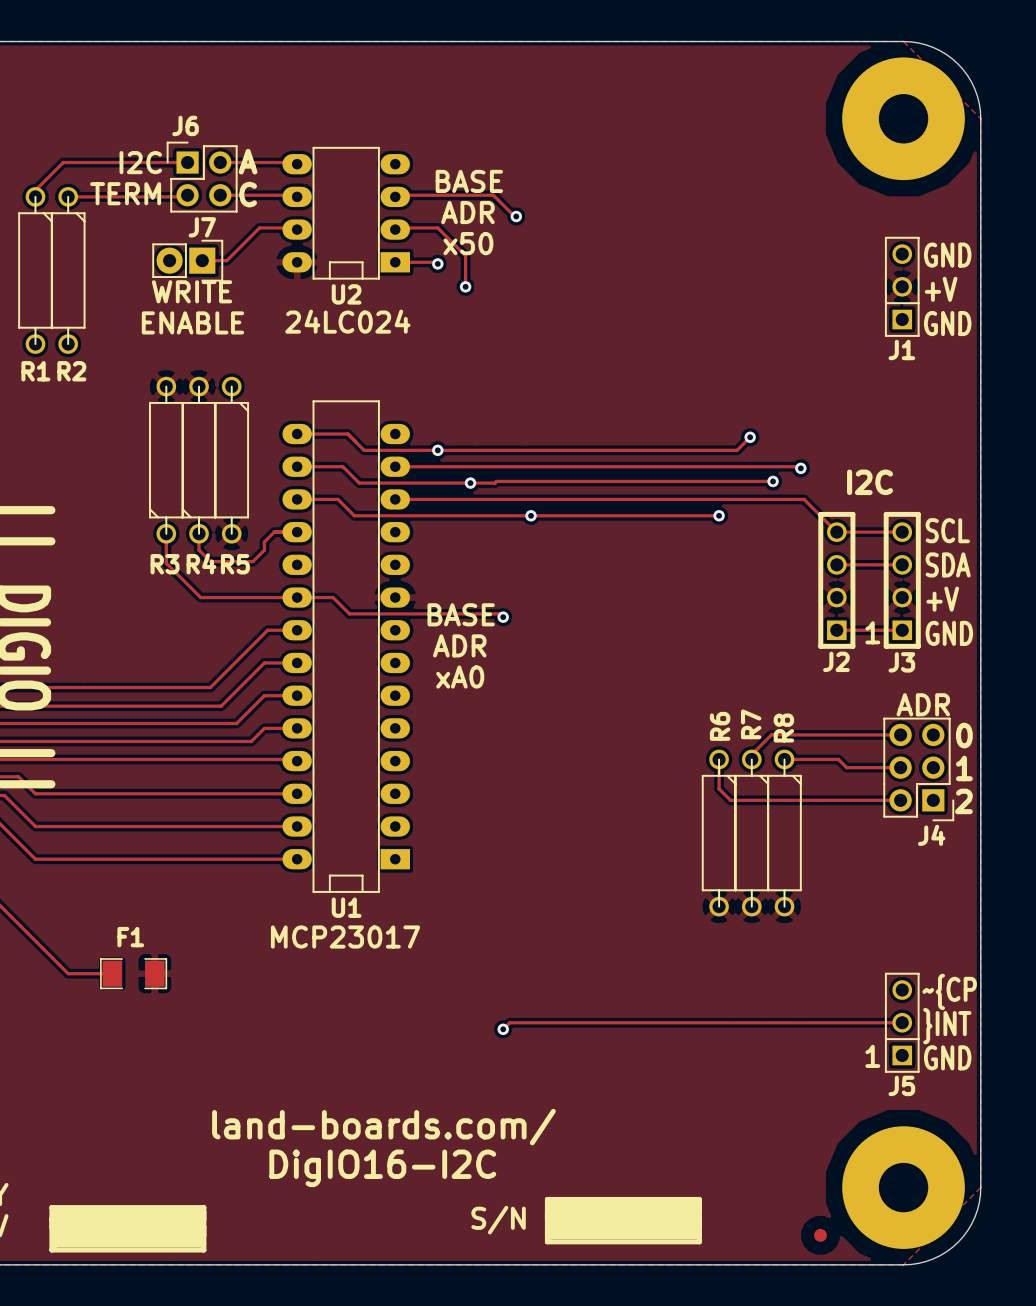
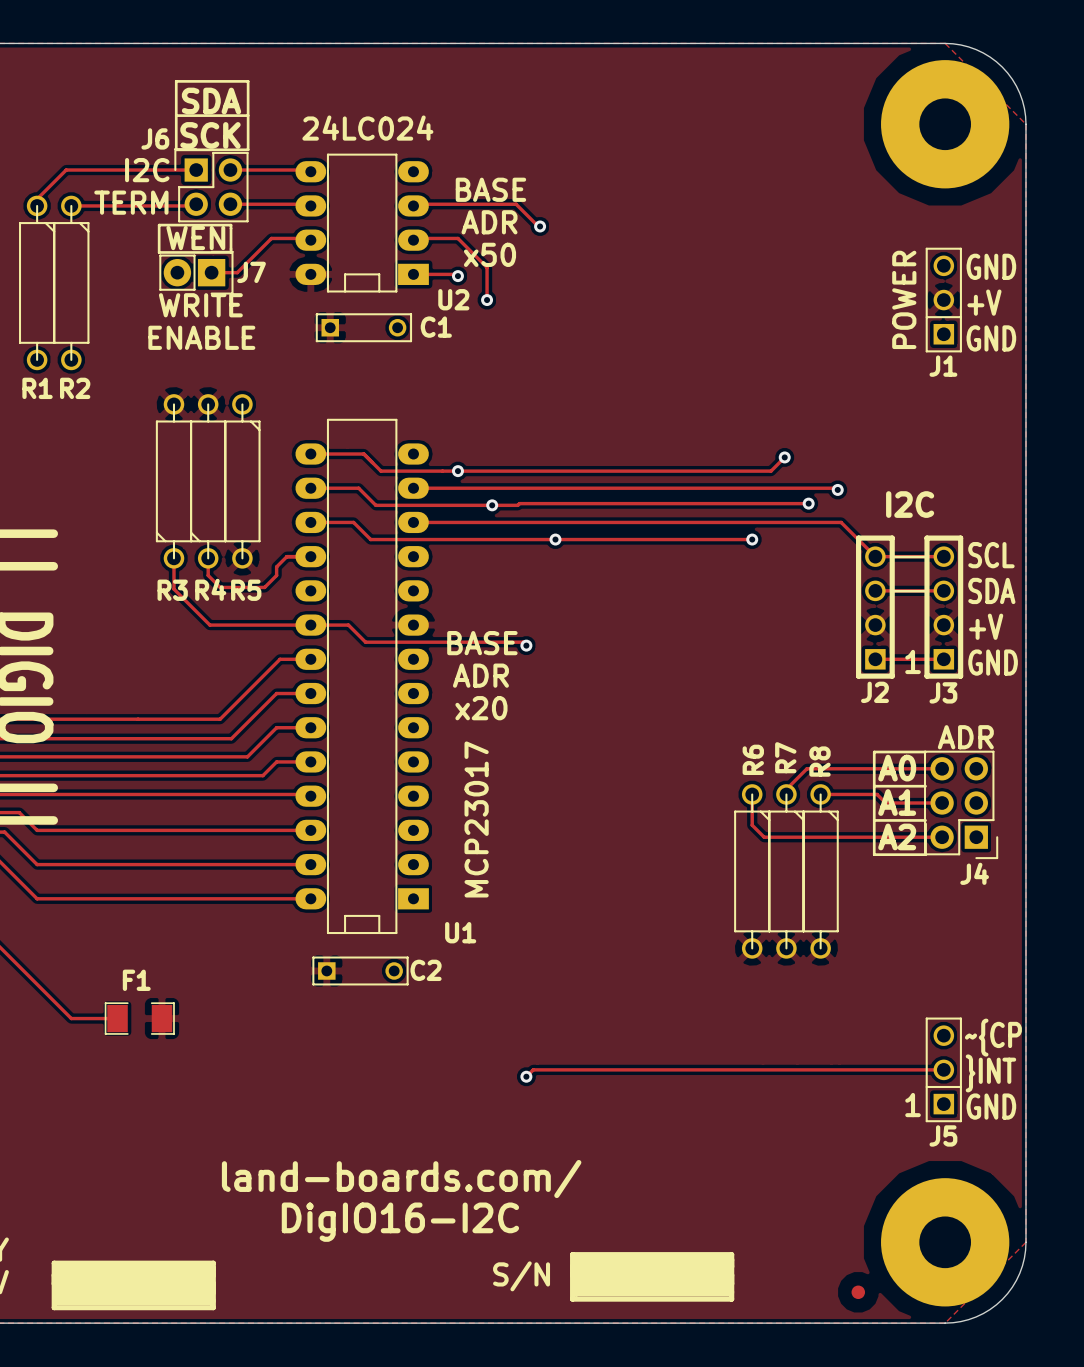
line: none -> (176, 81) (176, 149) (248, 149) (248, 81) (176, 81)
text: none -> SDA (211, 101)
line: none -> (176, 115) (248, 115)
J6 name position: J6 (185, 125) -> J6 (155, 138)
text: none -> SCK (210, 135)
text: A (248, 161) -> none
text: C (248, 194) -> none
line: none -> (159, 225) (159, 252) (231, 252) (231, 225) (159, 225)
text: none -> WEN (195, 238)
J7 name position: J7 (202, 227) -> J7 (251, 272)
text: none -> POWER (904, 299)
U2 name position: U2 (346, 294) -> U2 (453, 299)
C1: none -> (363, 327)
text position: 24LC024 (347, 321) -> 24LC024 (367, 128)
line: none -> (891, 556) (925, 556)
line: none -> (891, 591) (925, 591)
text: xA0 (460, 676) -> x20 (481, 708)
line: none -> (925, 752) (874, 752) (874, 854) (925, 854) (925, 823)
text: none -> A0 (897, 768)
text: 0 (964, 735) -> none
line: none -> (874, 786) (925, 786)
text: none -> A1 (897, 802)
text: 1 (964, 768) -> none
line: none -> (874, 820) (925, 820)
text: none -> A2 (897, 836)
text: 2 (963, 801) -> none
U1 name position: U1 (346, 907) -> U1 (460, 932)
C2: none -> (360, 970)
text rotation: 0° (345, 937) -> 90° counterclockwise (476, 819)
text position: MCP23017 (345, 937) -> MCP23017 (476, 819)

